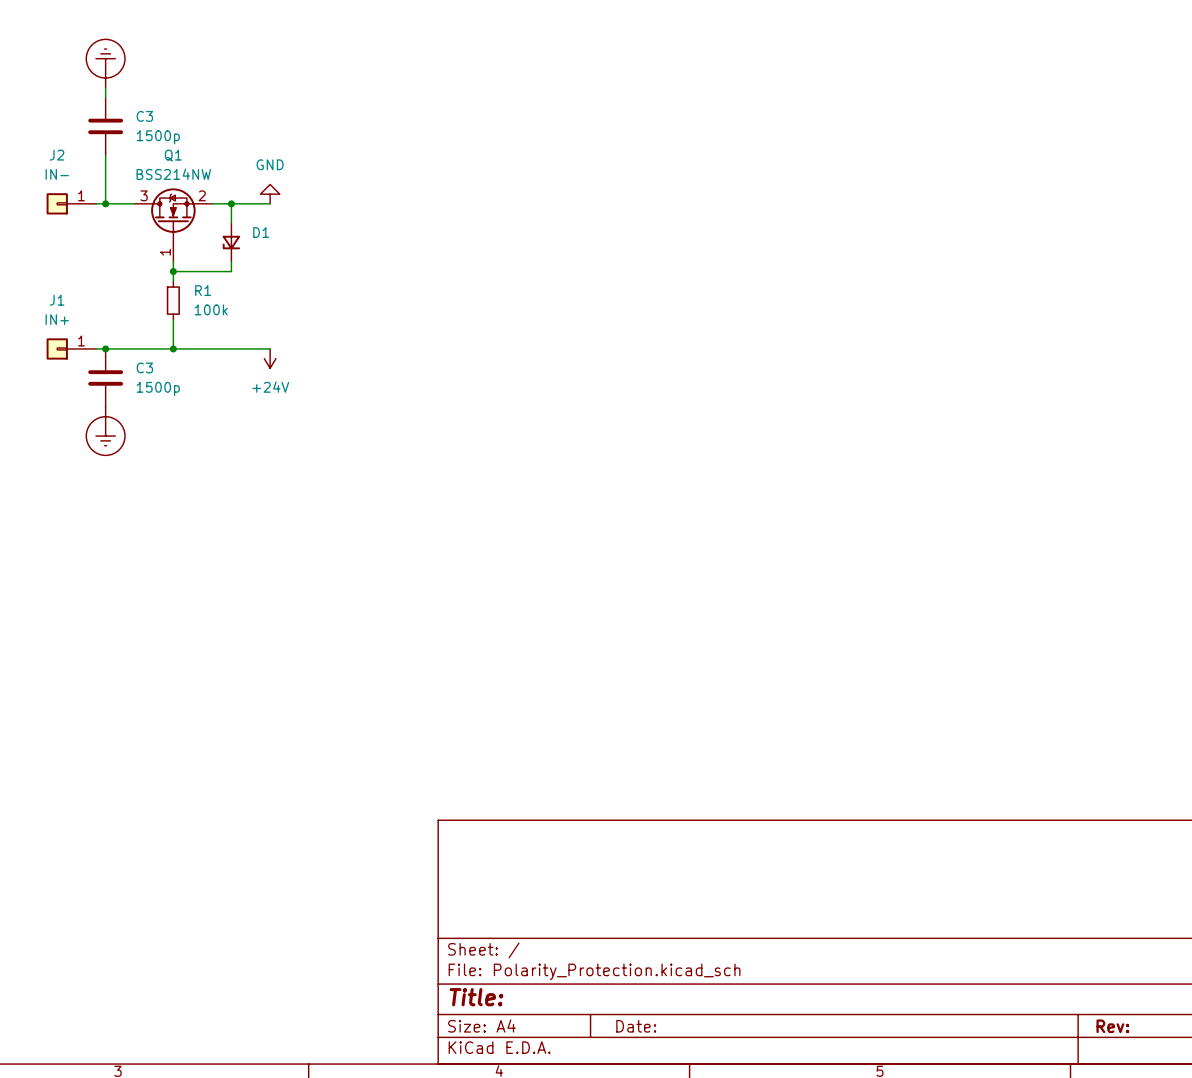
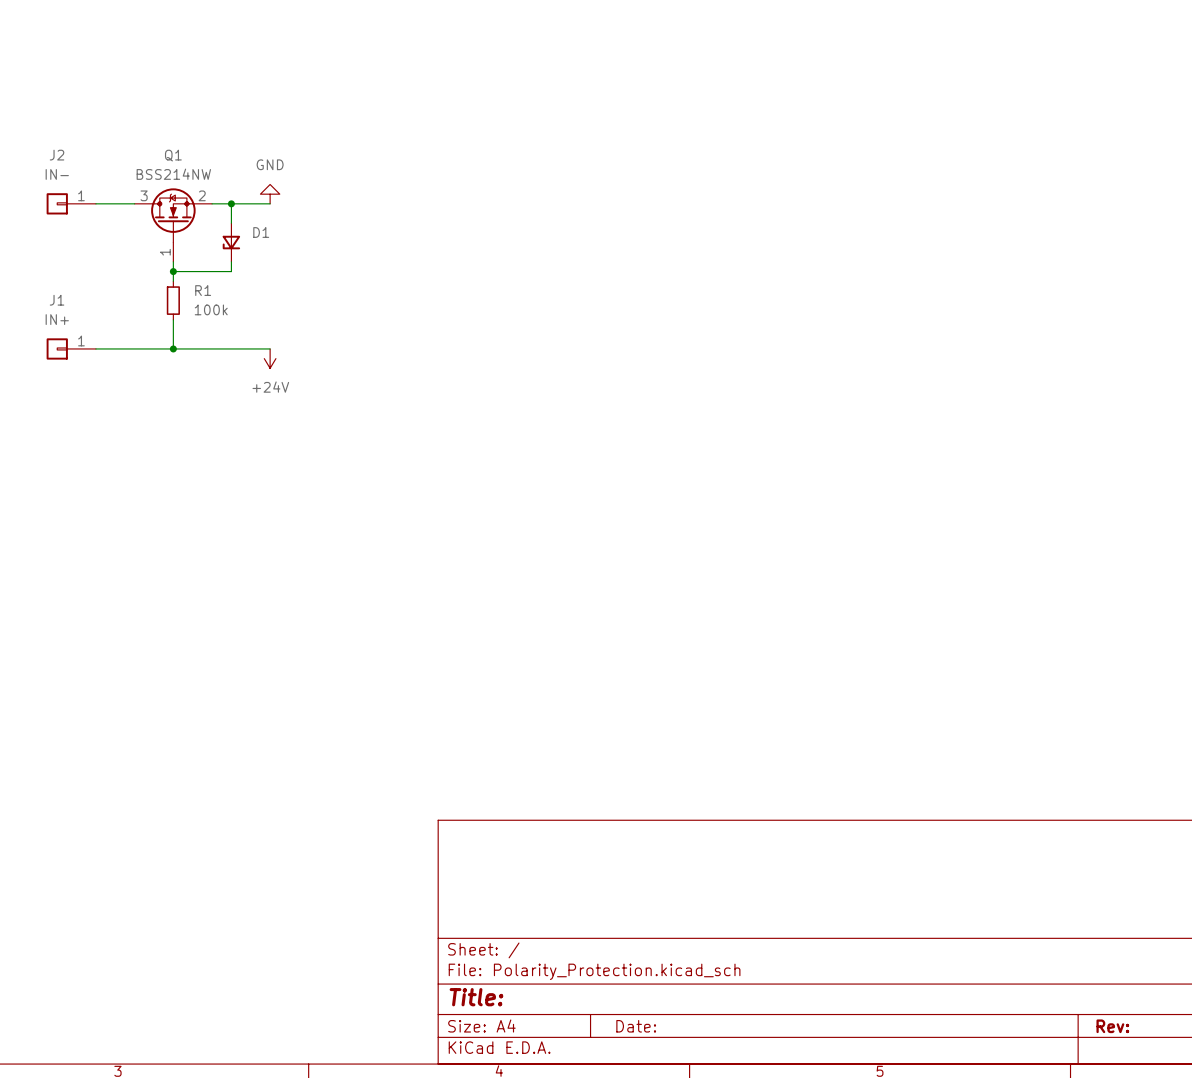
power symbol: (105, 63) -> none
wire: (105, 87) (105, 97) -> none
C3: 1500p (105, 126) -> none
wire: (105, 155) (105, 203) -> none
junction: (105, 203) -> none
junction: (105, 348) -> none
C3: 1500p (105, 378) -> none
power symbol: (105, 431) -> none

